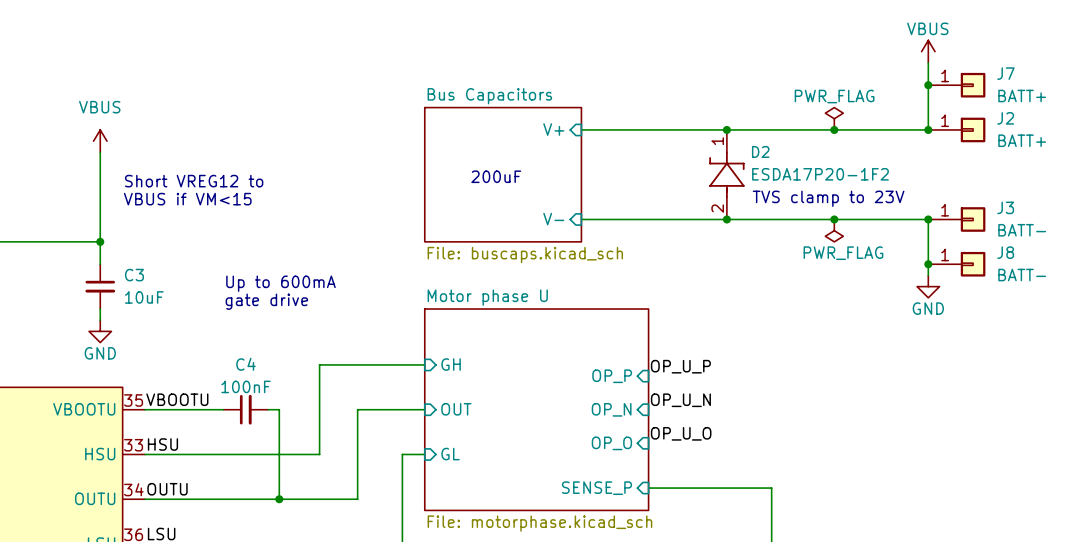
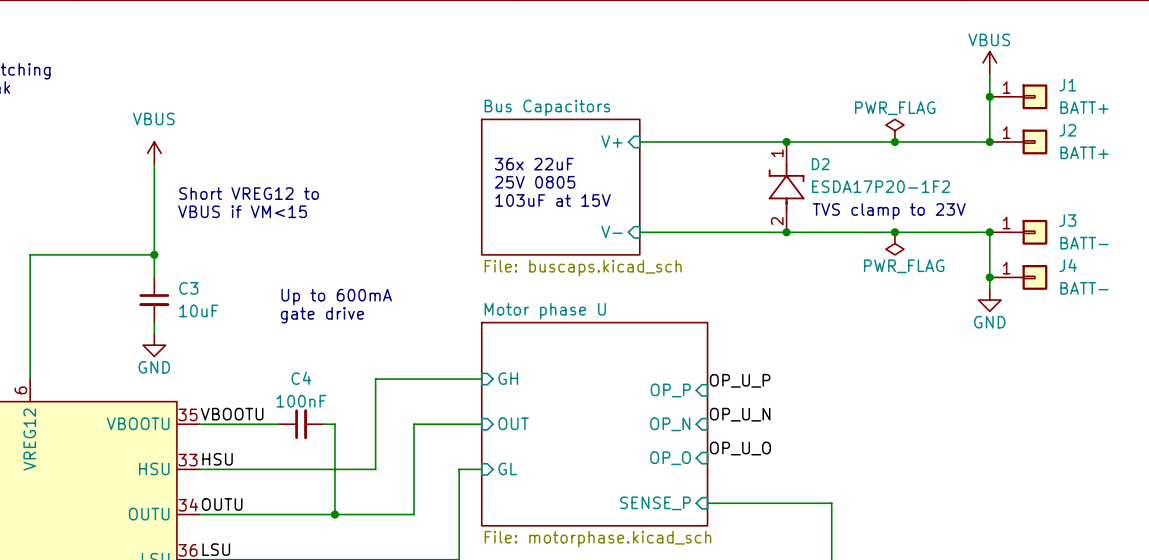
J7 name: J7 (1005, 73) -> J1 (1067, 85)
text: none -> 36x 22uF (534, 164)
text: none -> 25V 0805 (535, 182)
text: 200uF (496, 176) -> none
text: none -> 103uF at 15V (553, 200)
J8 name: J8 (1005, 252) -> J4 (1068, 265)

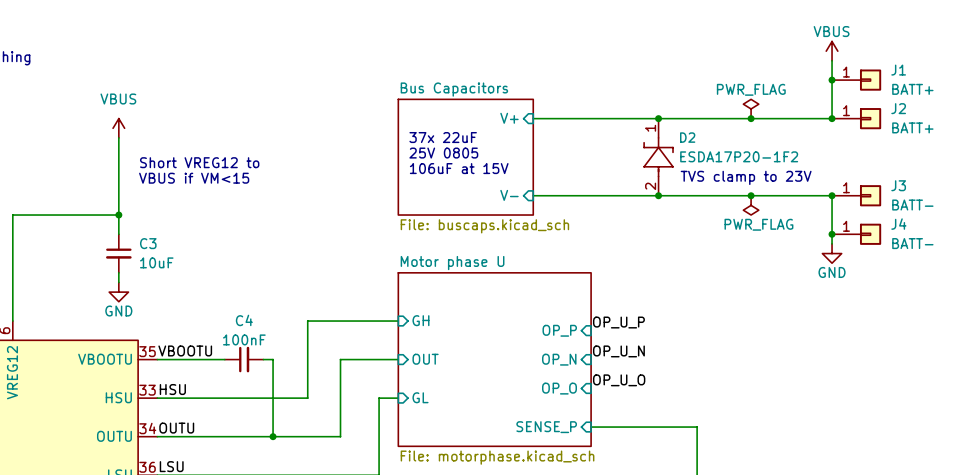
text: 36x 22uF (534, 164) -> 37x 22uF (443, 137)
text: 103uF at 15V (553, 200) -> 106uF at 15V (459, 168)
text: Up to 600mA (336, 297) -> none
text: gate drive (322, 315) -> none

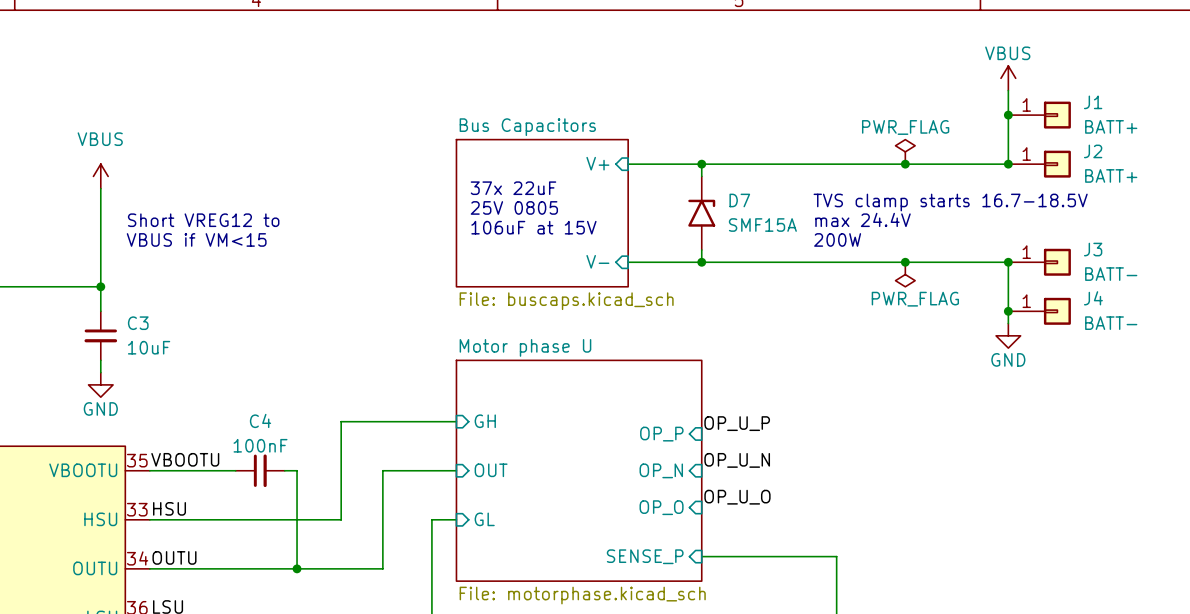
wire: none -> (701, 164) (701, 176)
junction: none -> (701, 164)
junction: (658, 118) -> none
text: none -> TVS clamp starts 16.7-18.5V (950, 202)
D7: none -> SMF15A (701, 213)
D2: ESDA17P20-1F2 (658, 157) -> none
text: none -> max 24.4V (863, 219)
text: TVS clamp to 23V (746, 177) -> 200W (837, 239)
wire: none -> (701, 250) (701, 262)
junction: none -> (701, 262)
junction: (658, 195) -> none

